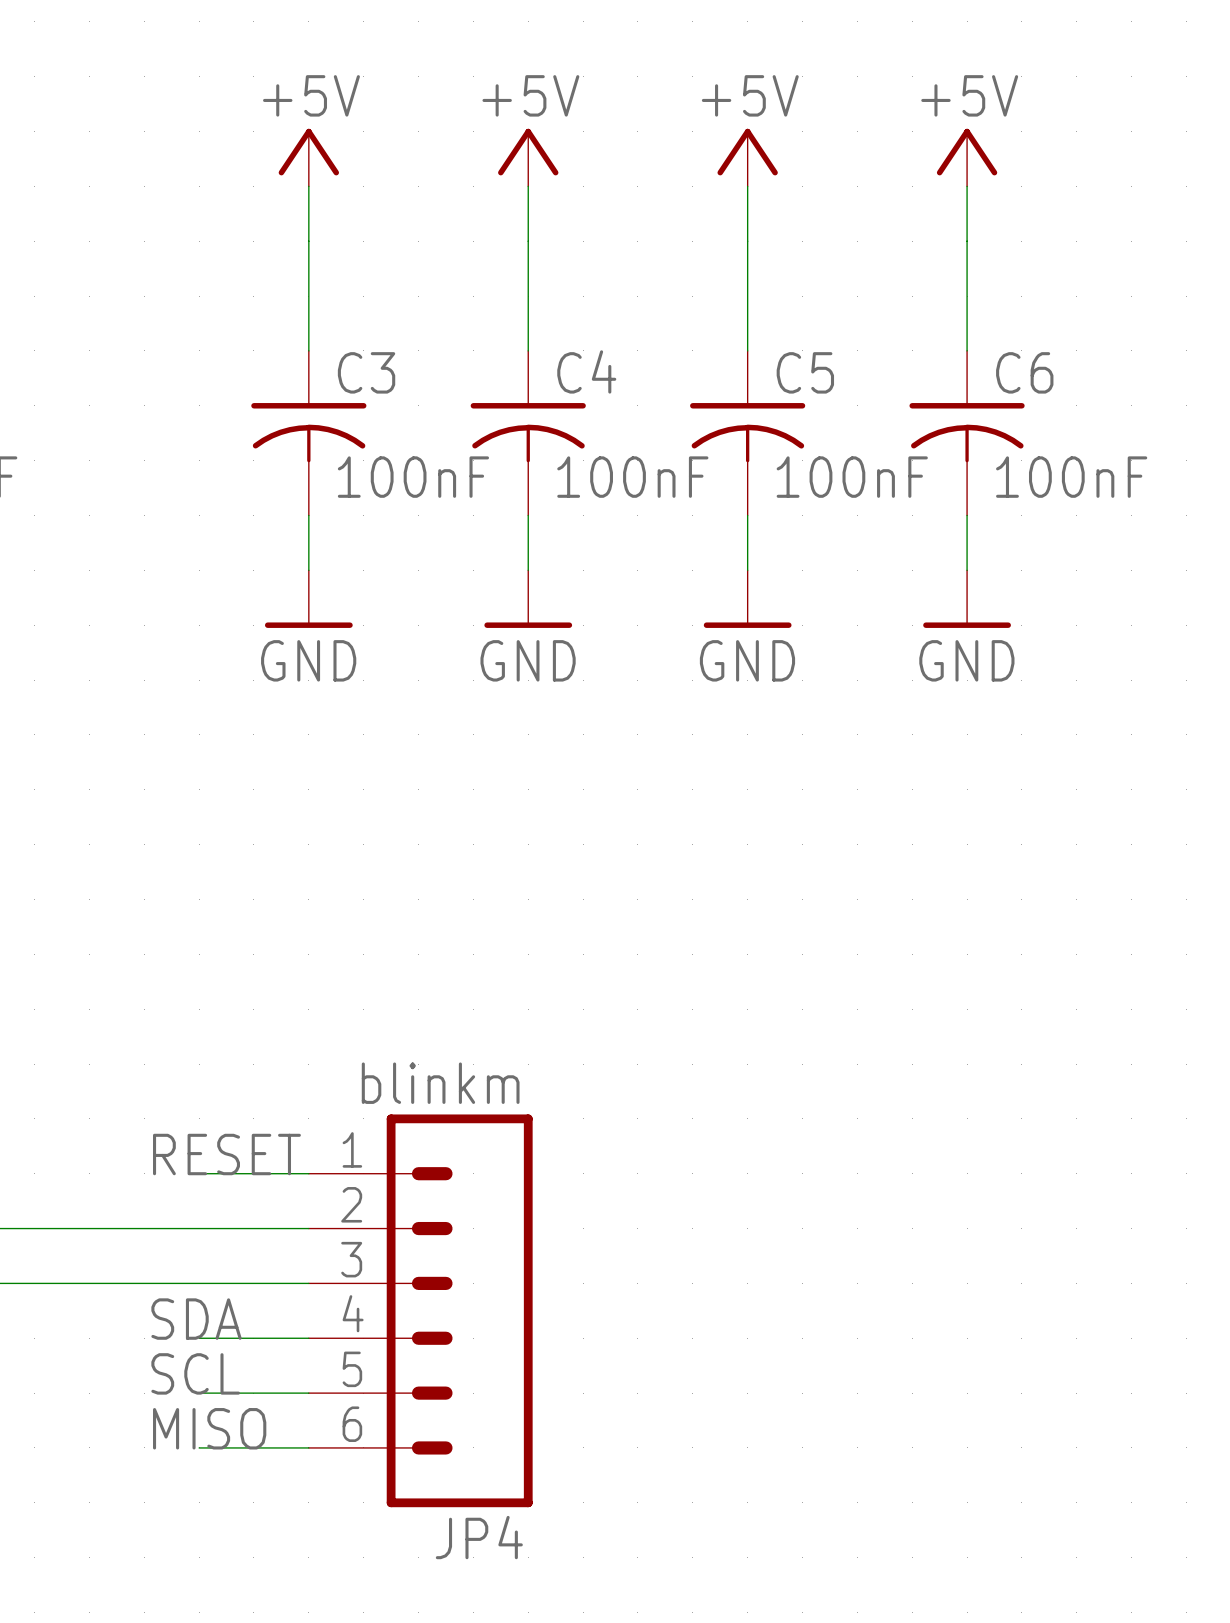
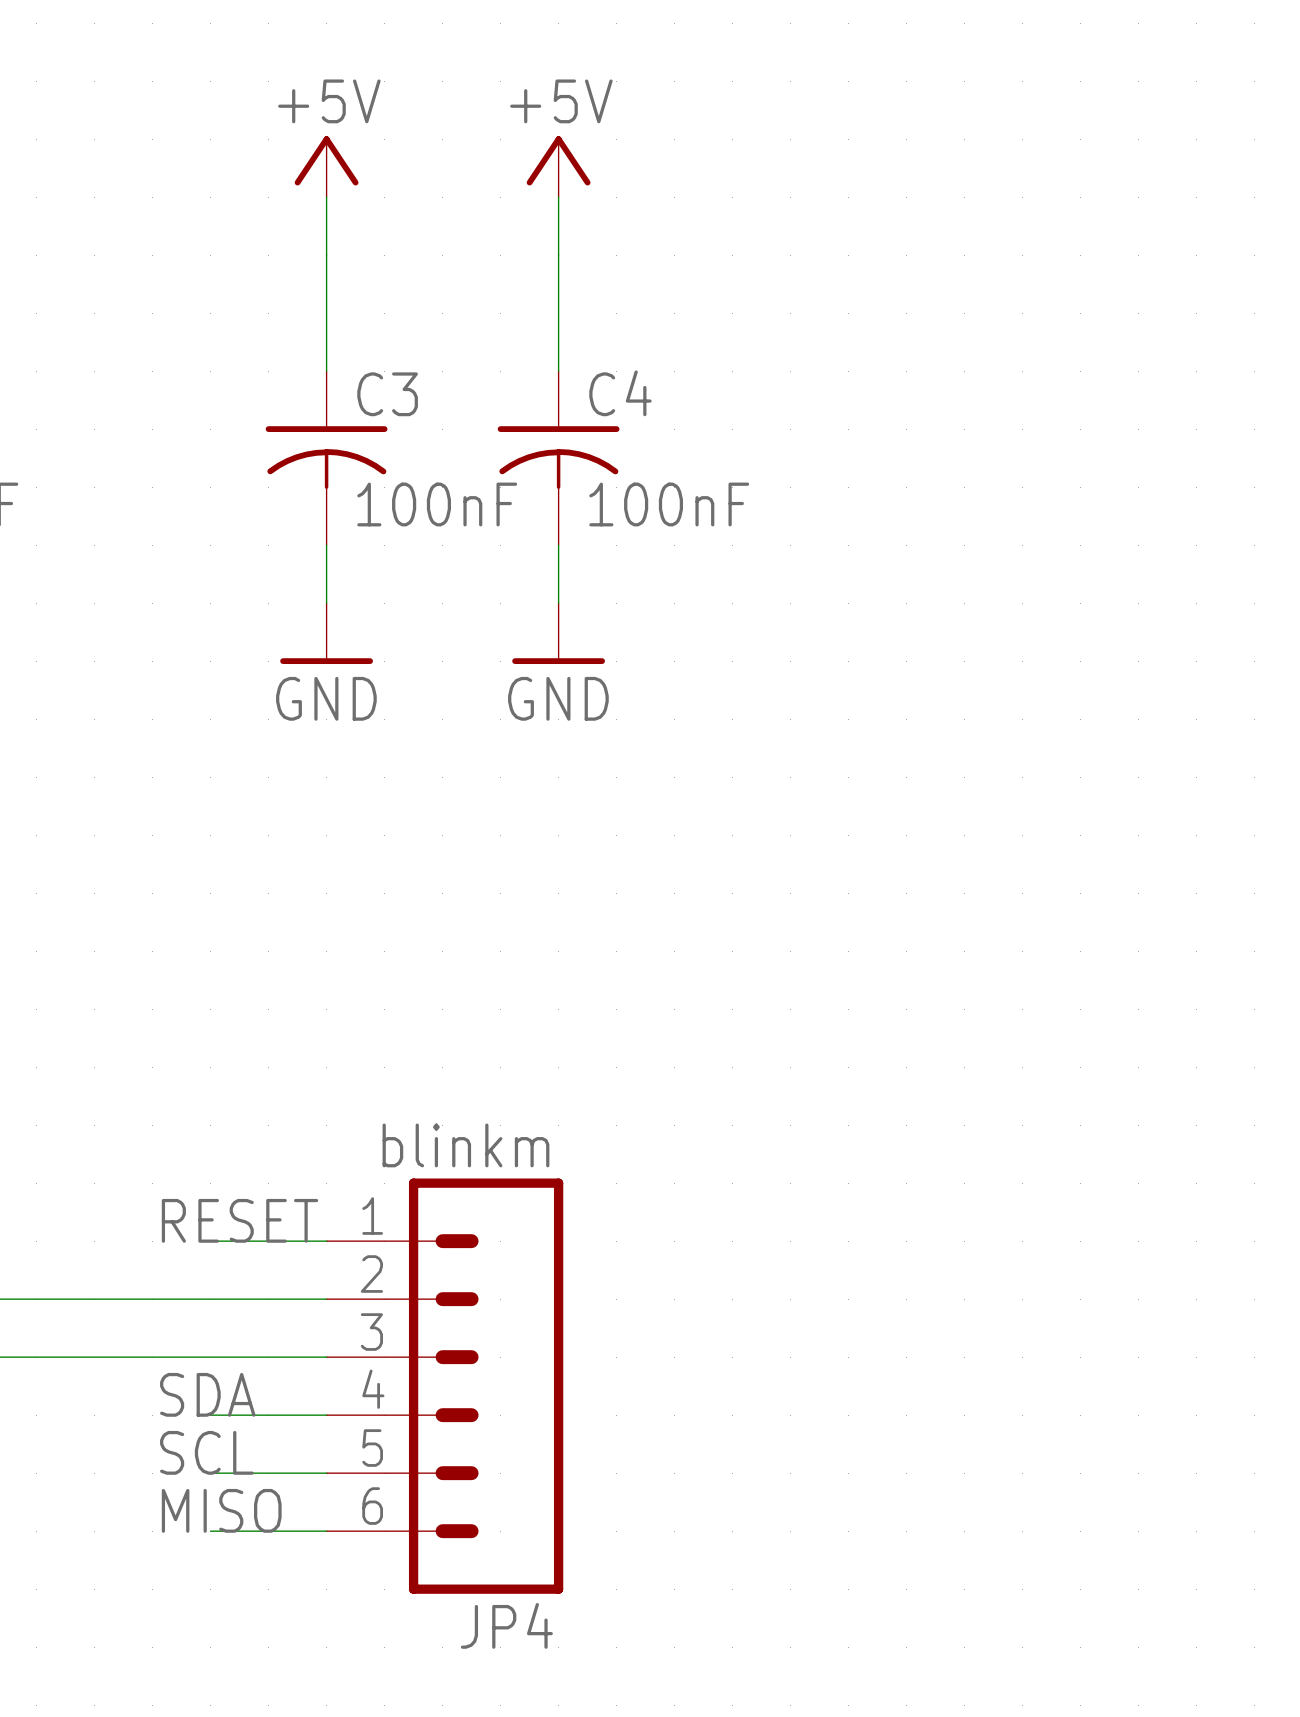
power symbol: +5V (747, 157) -> none
power symbol: +5V (967, 157) -> none
wire: (747, 186) (747, 350) -> none
wire: (967, 186) (967, 350) -> none
C5: 100nF (747, 433) -> none
C6: 100nF (967, 433) -> none
wire: (747, 515) (747, 570) -> none
wire: (967, 515) (967, 570) -> none
power symbol: GND (747, 599) -> none
power symbol: GND (967, 599) -> none

